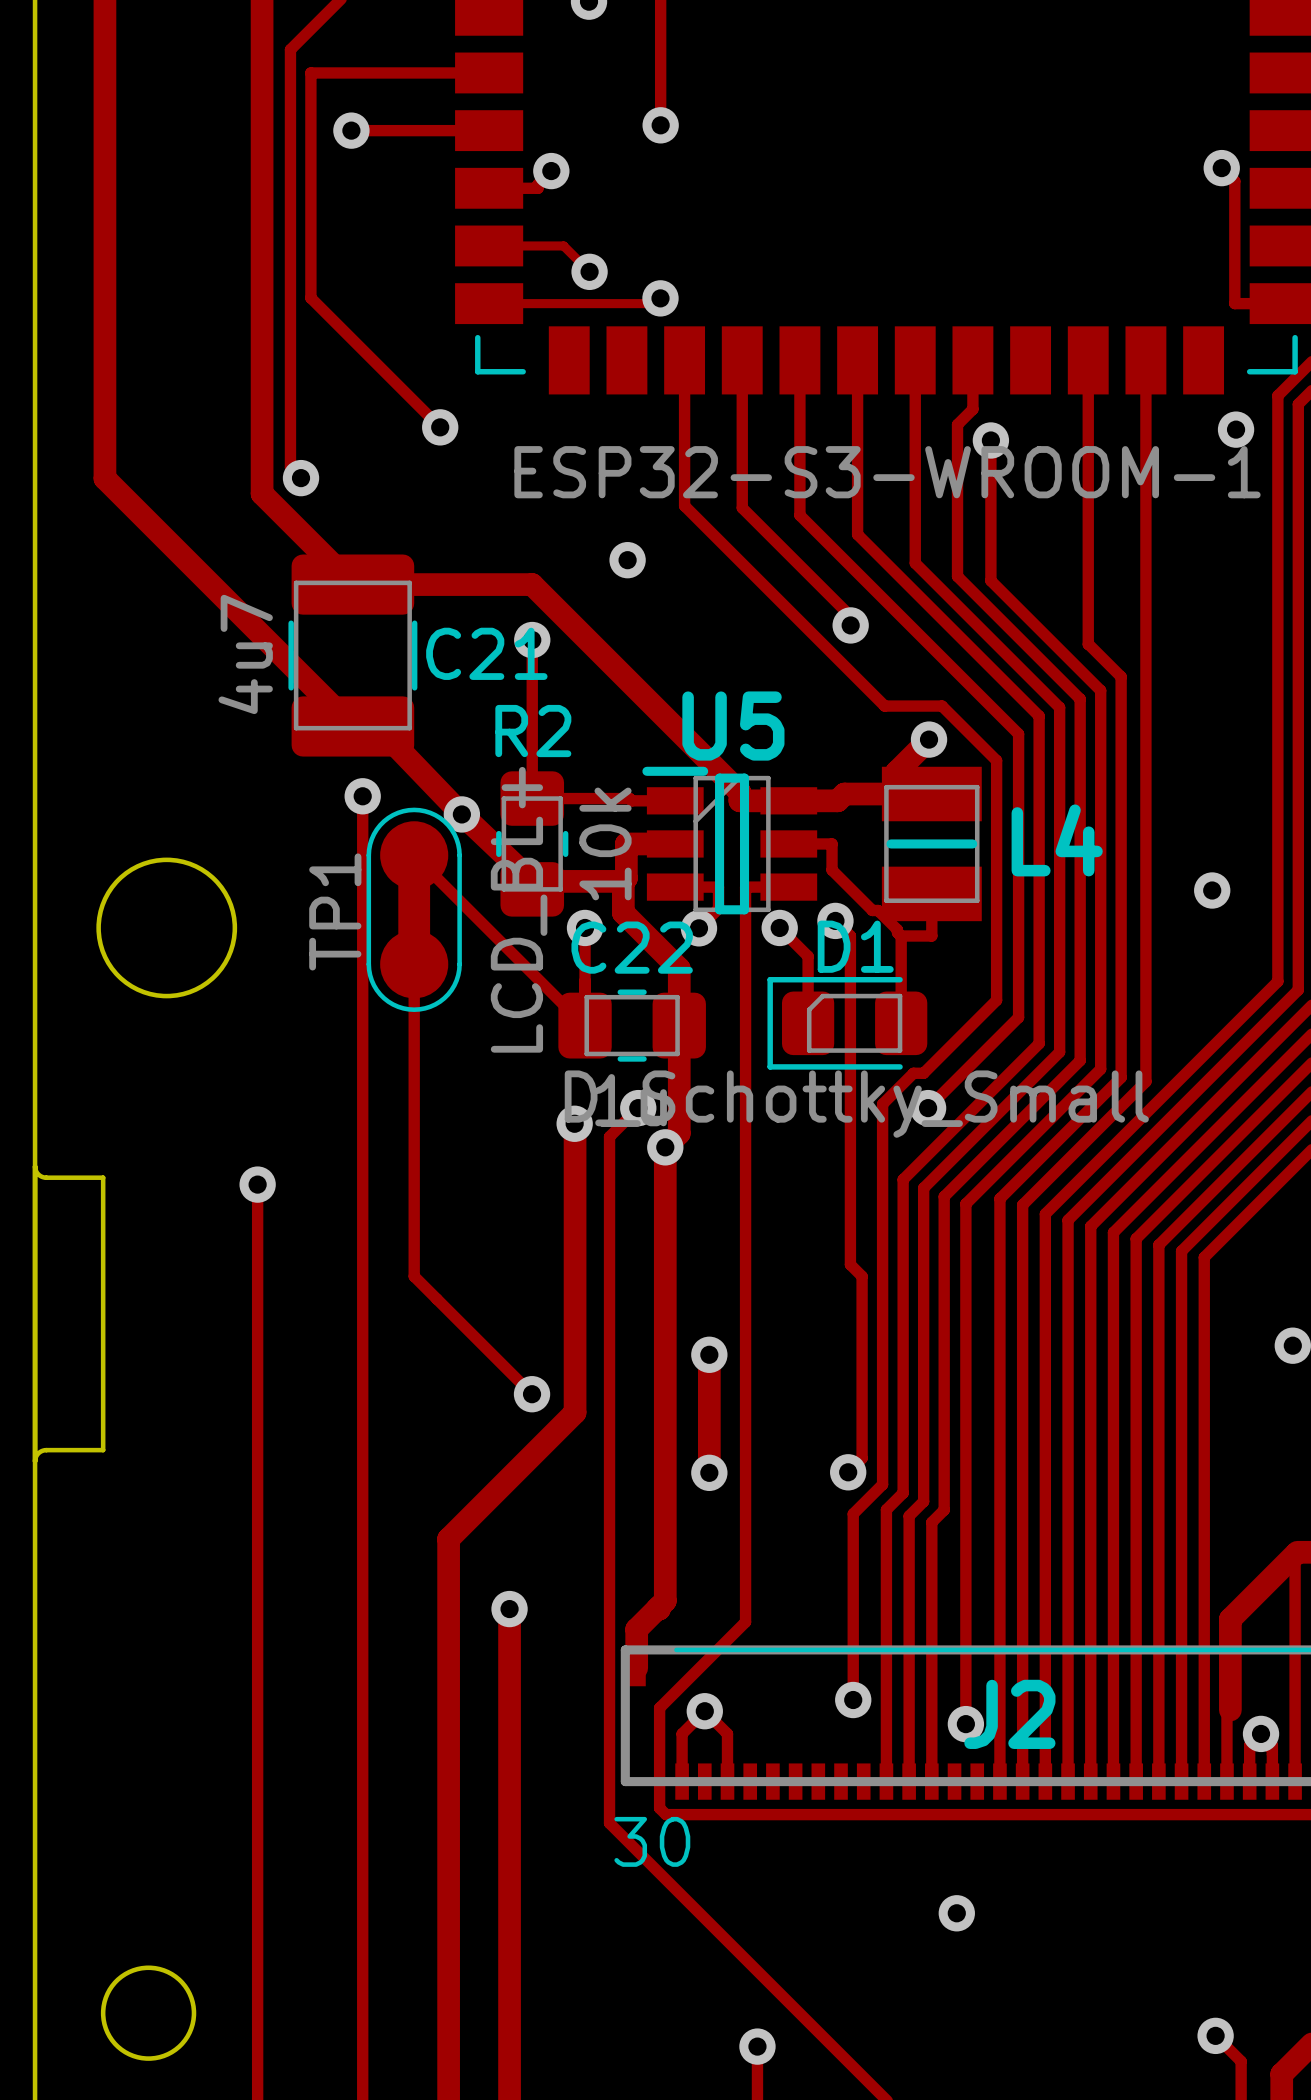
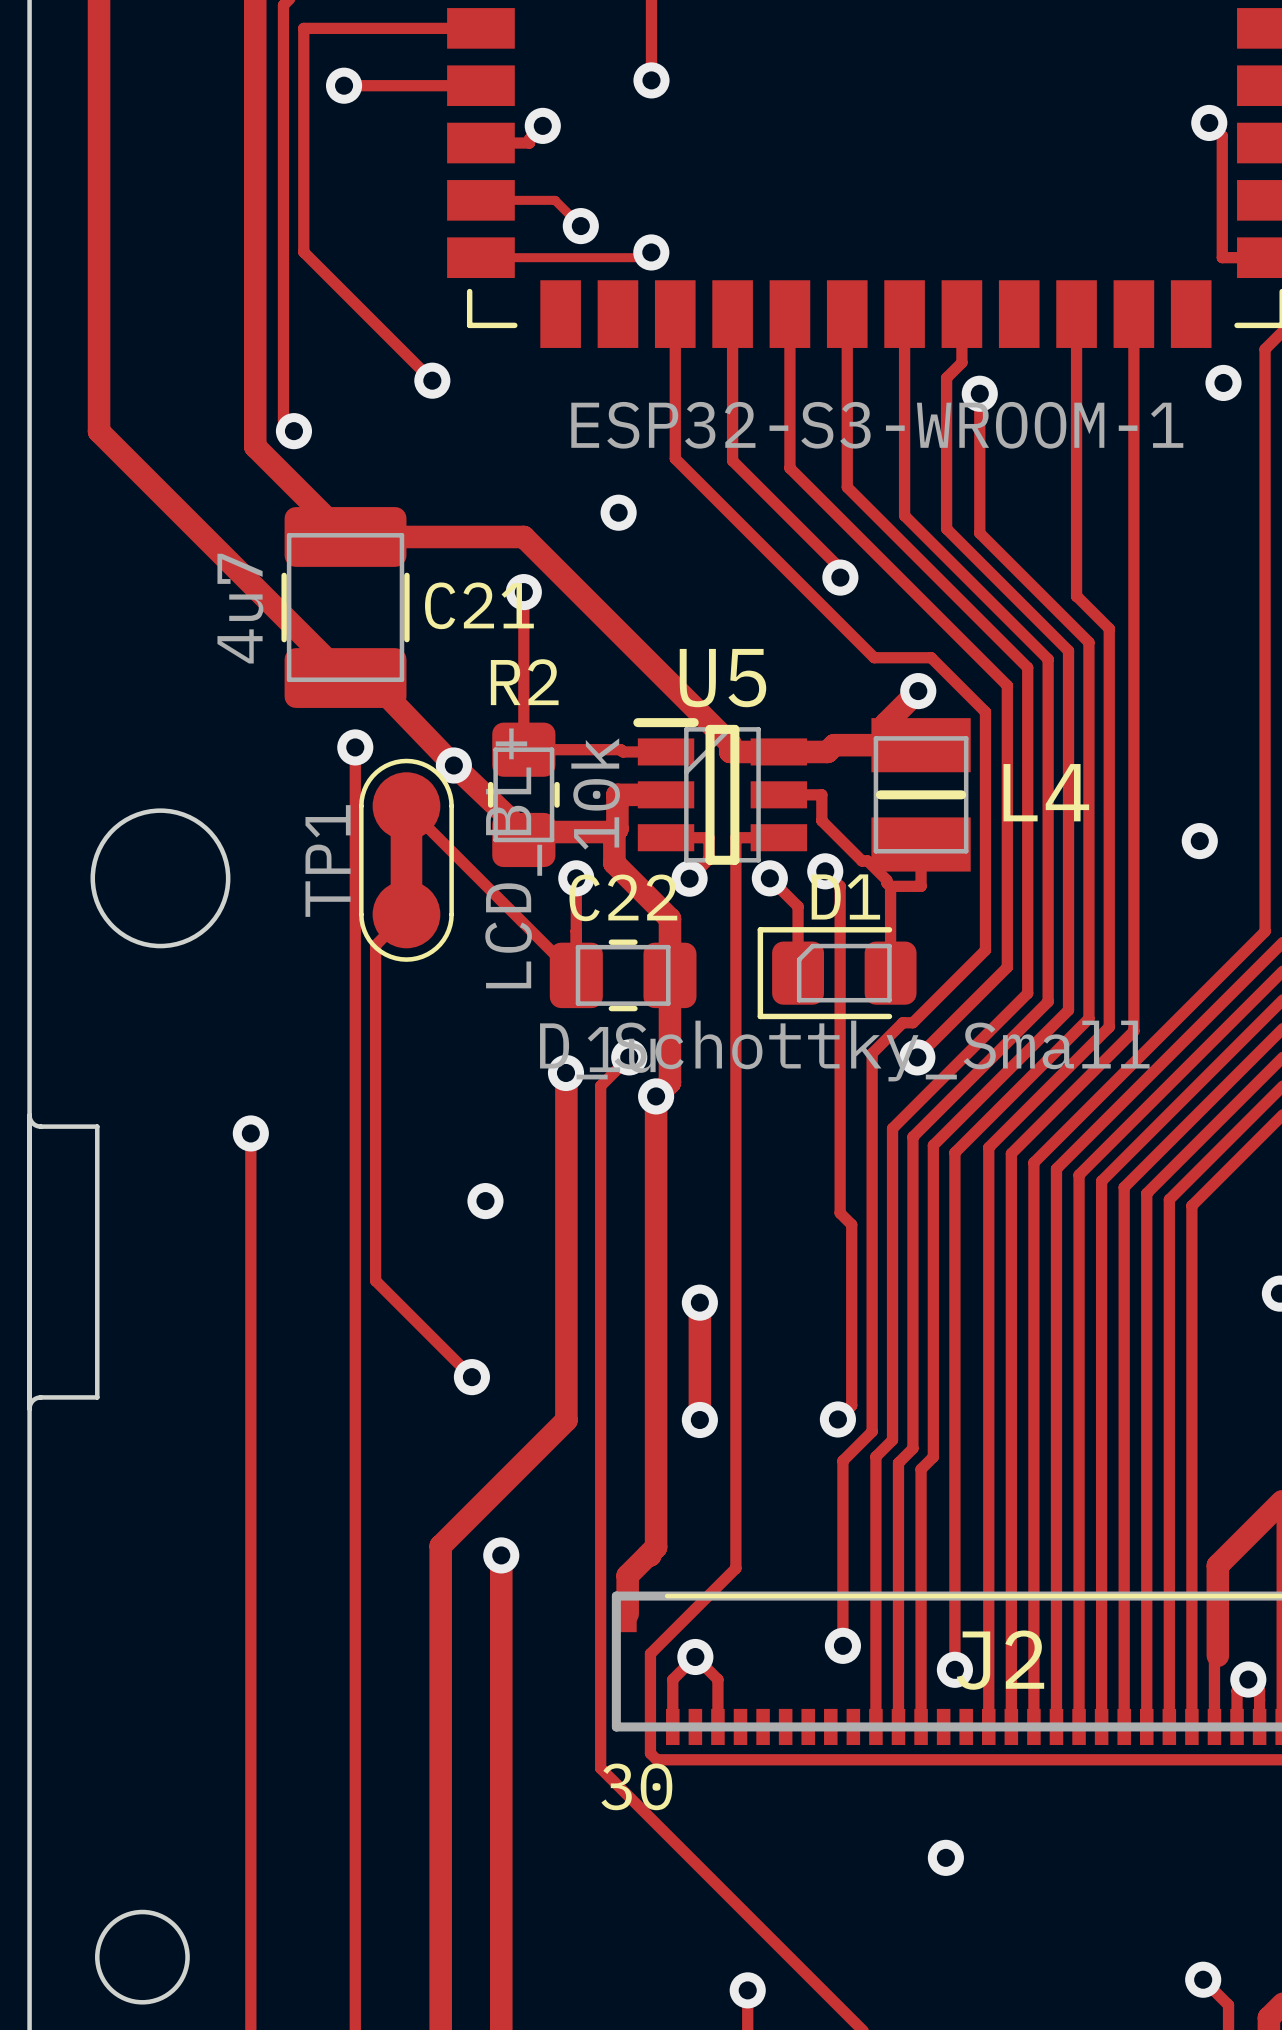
track: (414, 964) (414, 1276) (532, 1394) -> (406, 914) (375, 945) (375, 1280) (471, 1377)
via: none -> (485, 1201)
via position: (532, 1394) -> (471, 1377)
track: (575, 1412) (448, 1539) (448, 1599) -> (566, 1360) (566, 1420) (440, 1546)

